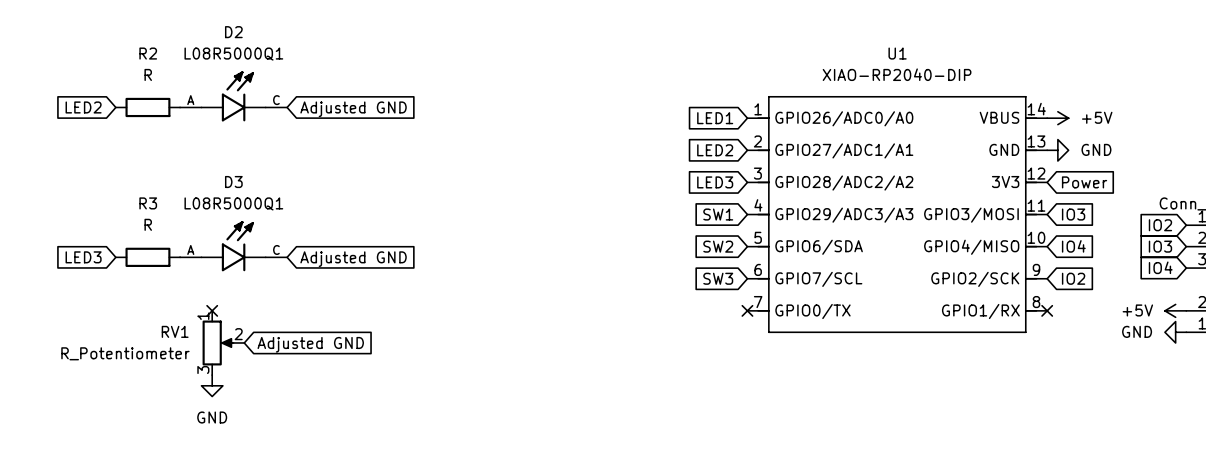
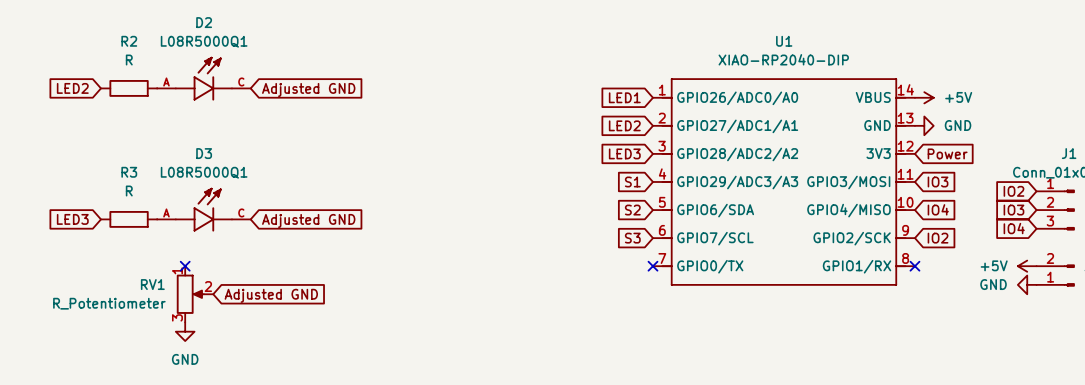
global label: SW1 (718, 214) -> S1 (632, 181)
global label: SW2 (718, 246) -> S2 (632, 210)
global label: SW3 (718, 278) -> S3 (632, 238)

